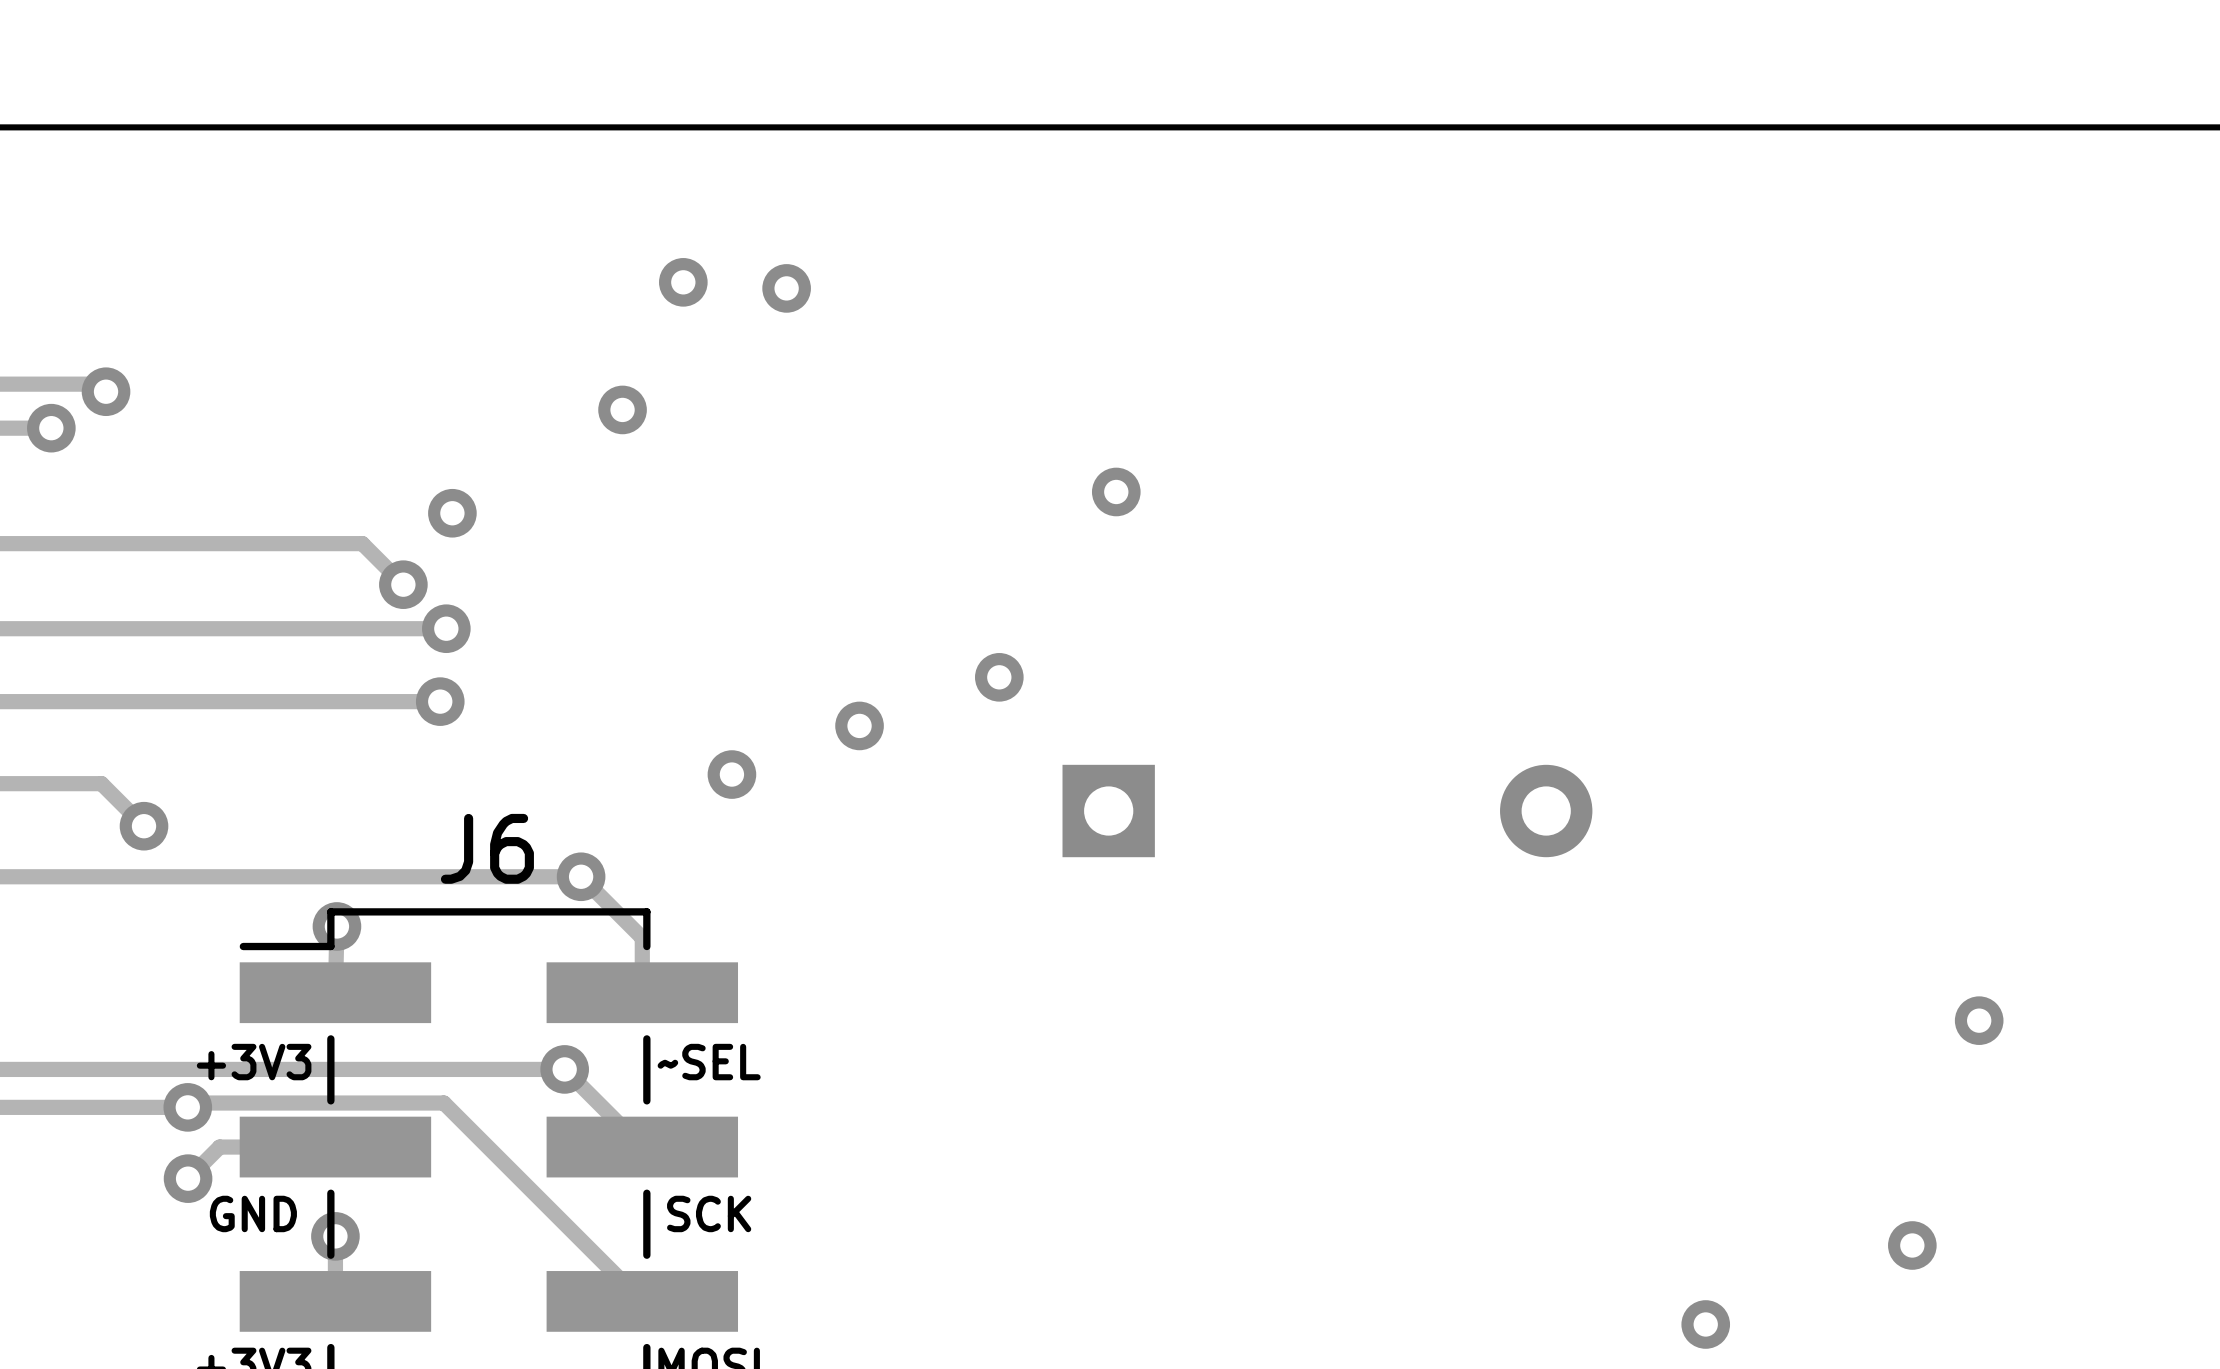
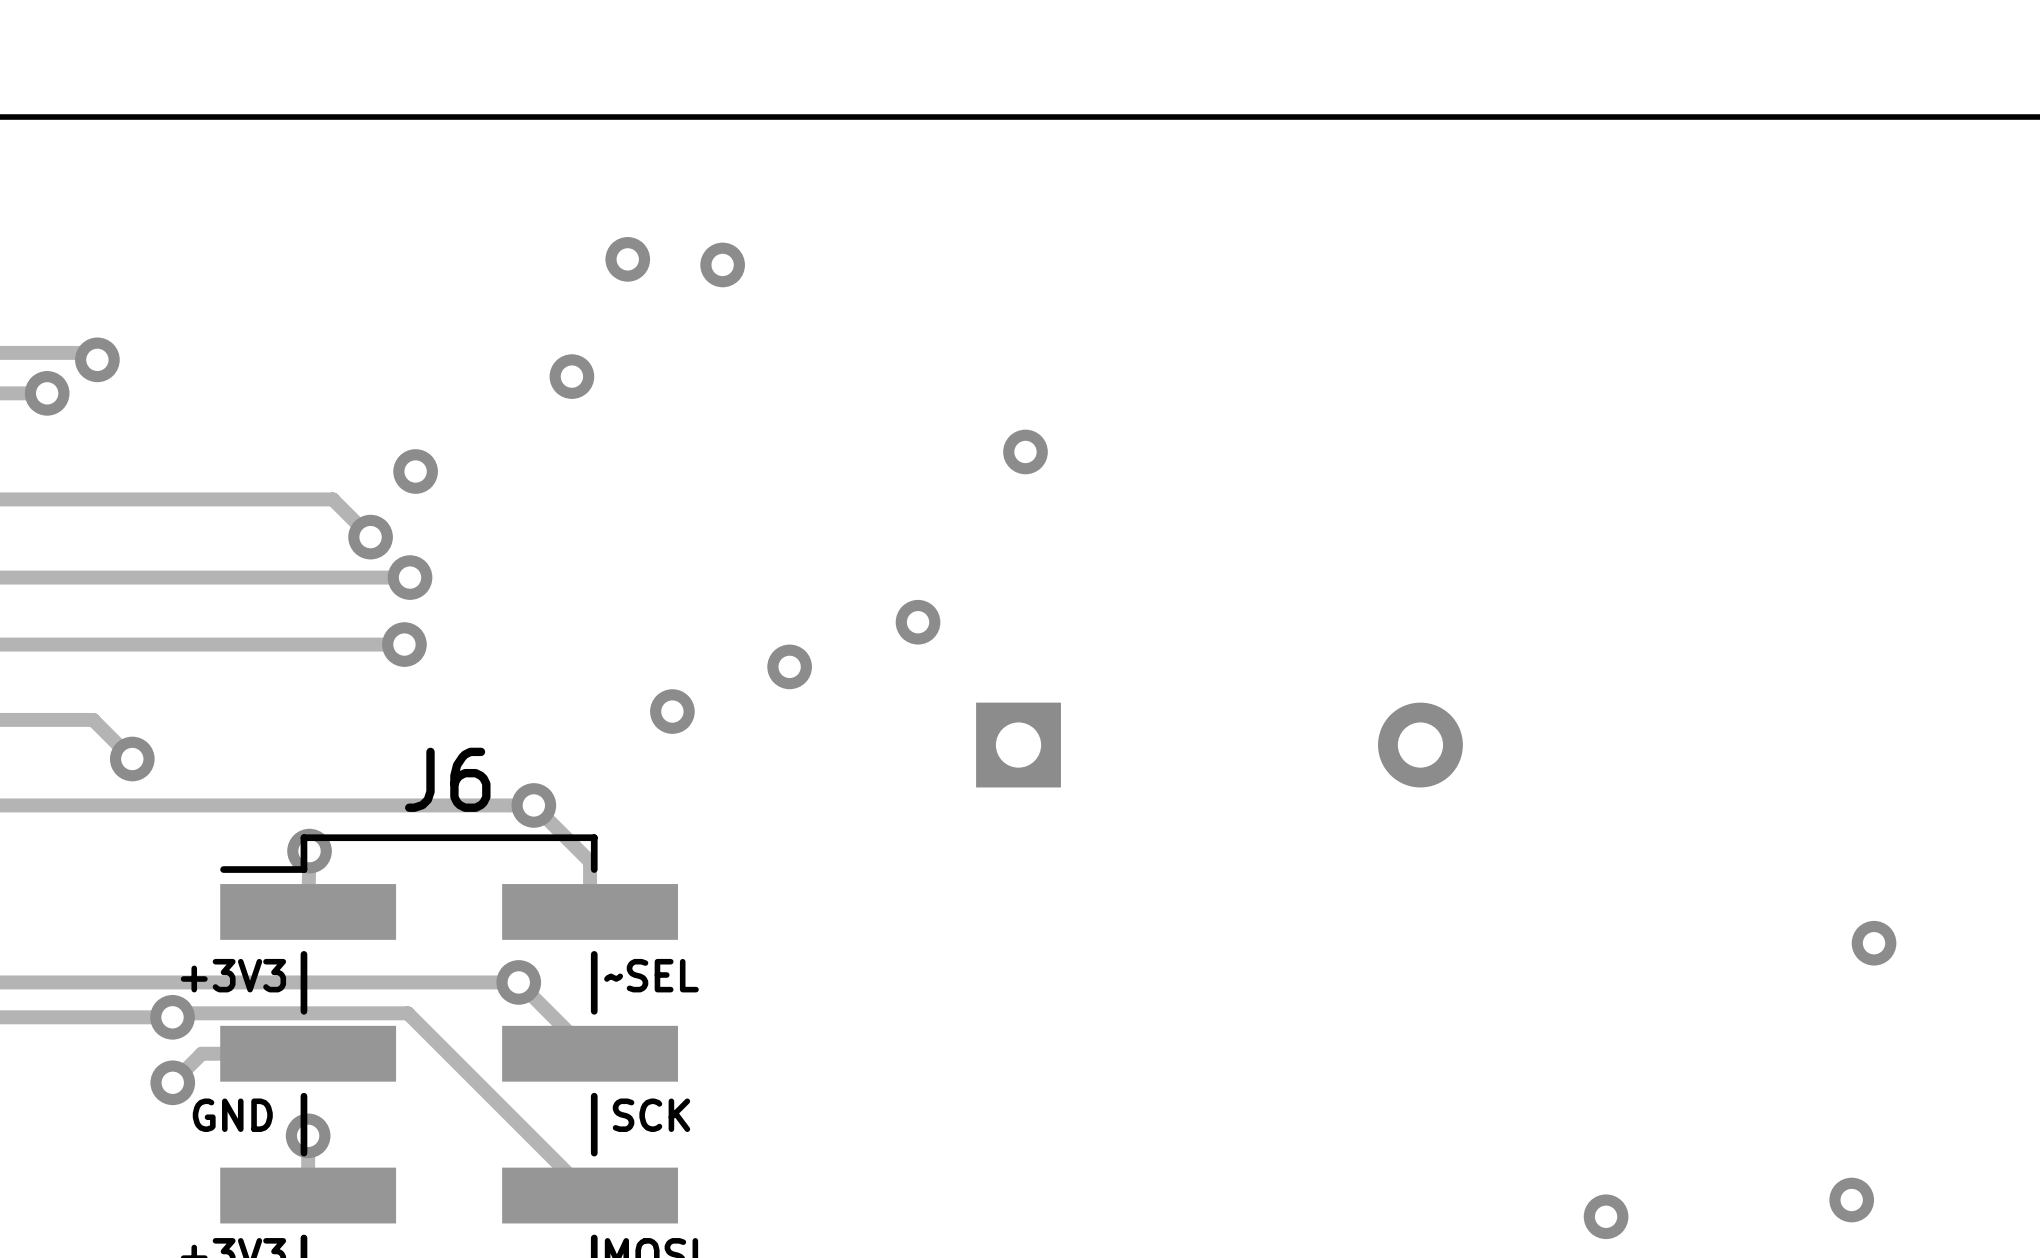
via position: (1979, 1020) -> (1874, 943)
via: (1912, 1245) -> none
via: none -> (1851, 1200)
via position: (1705, 1324) -> (1606, 1216)

